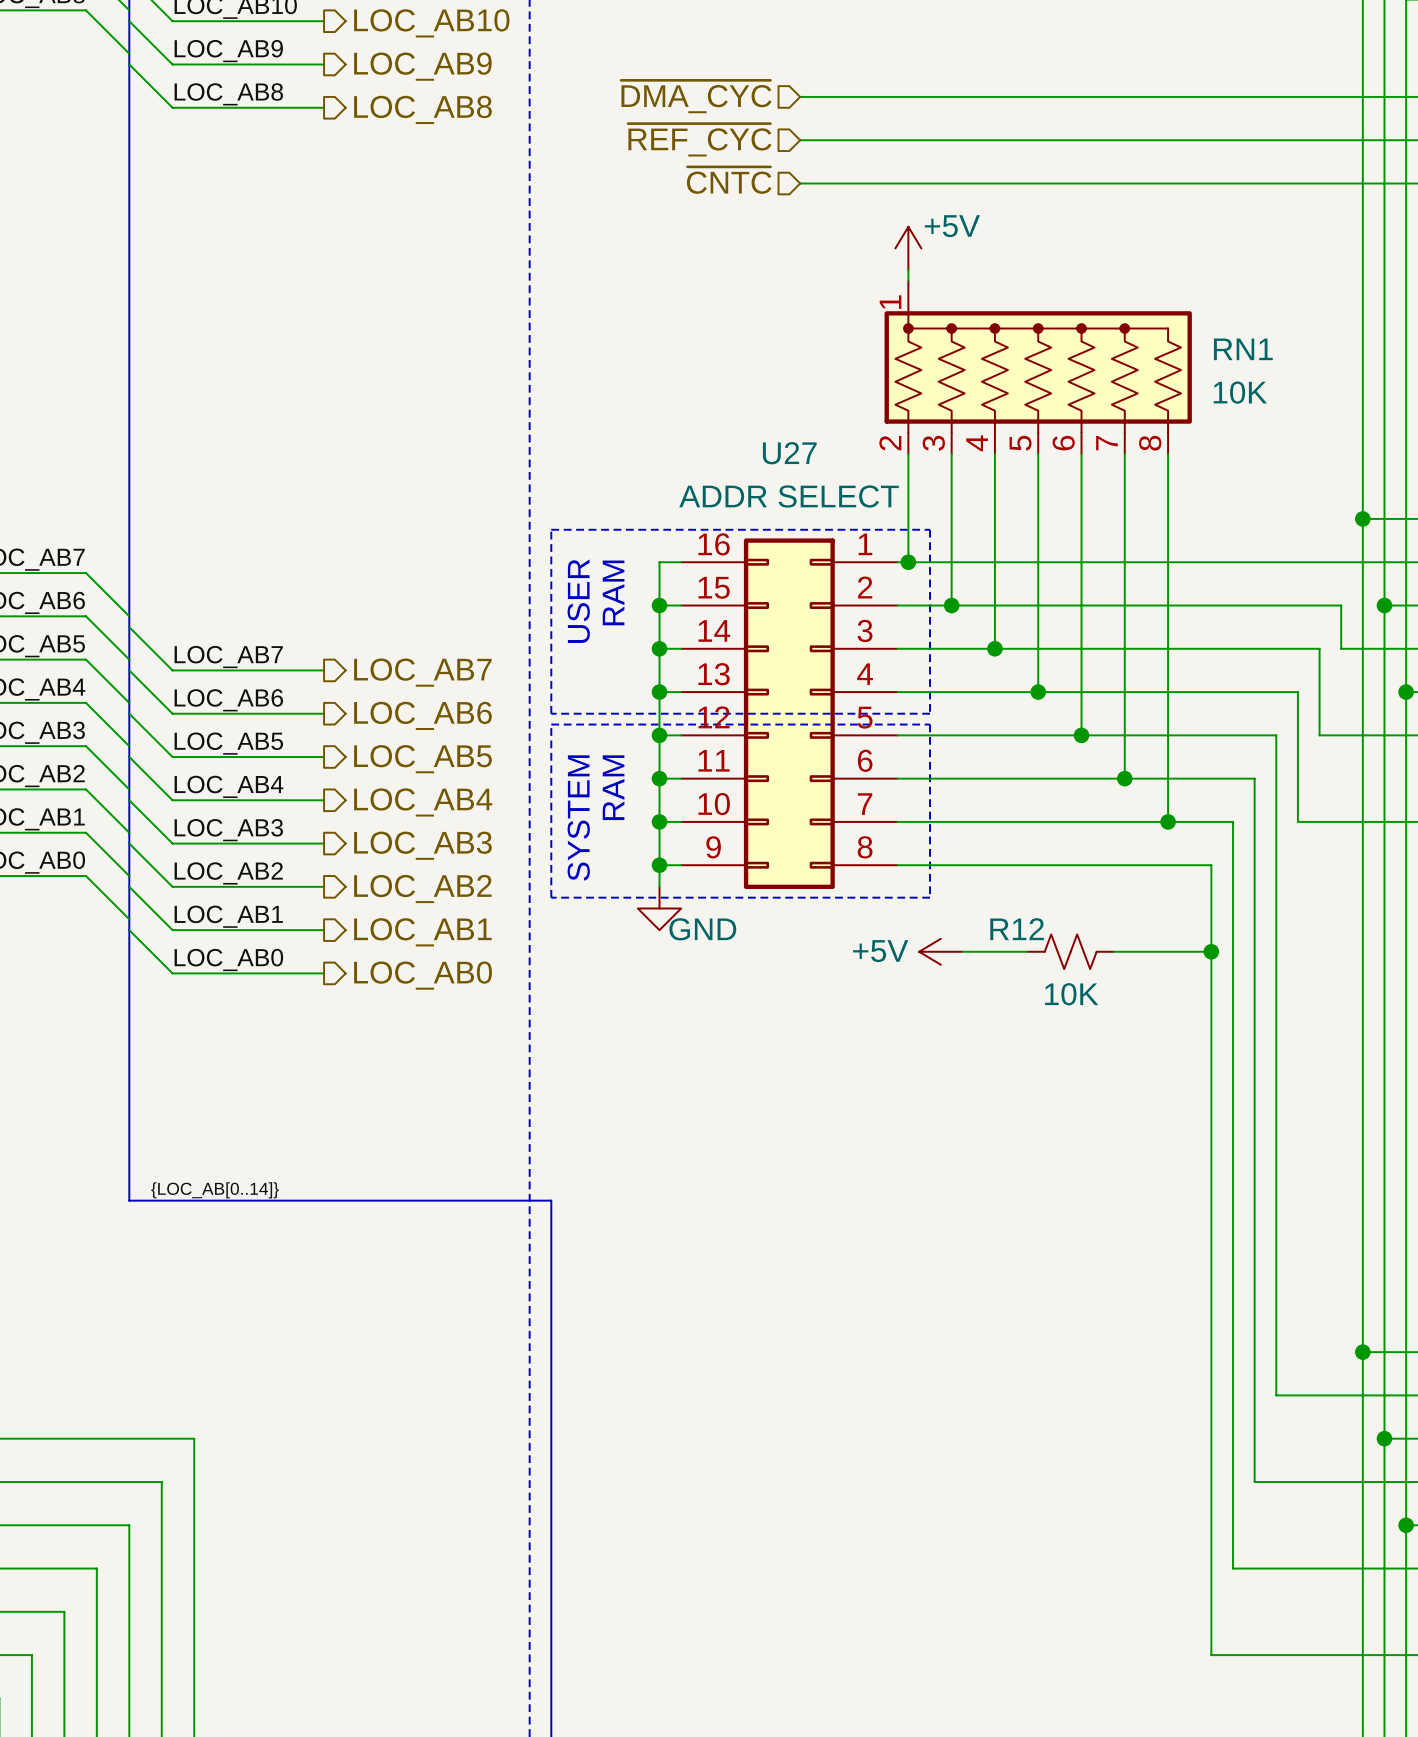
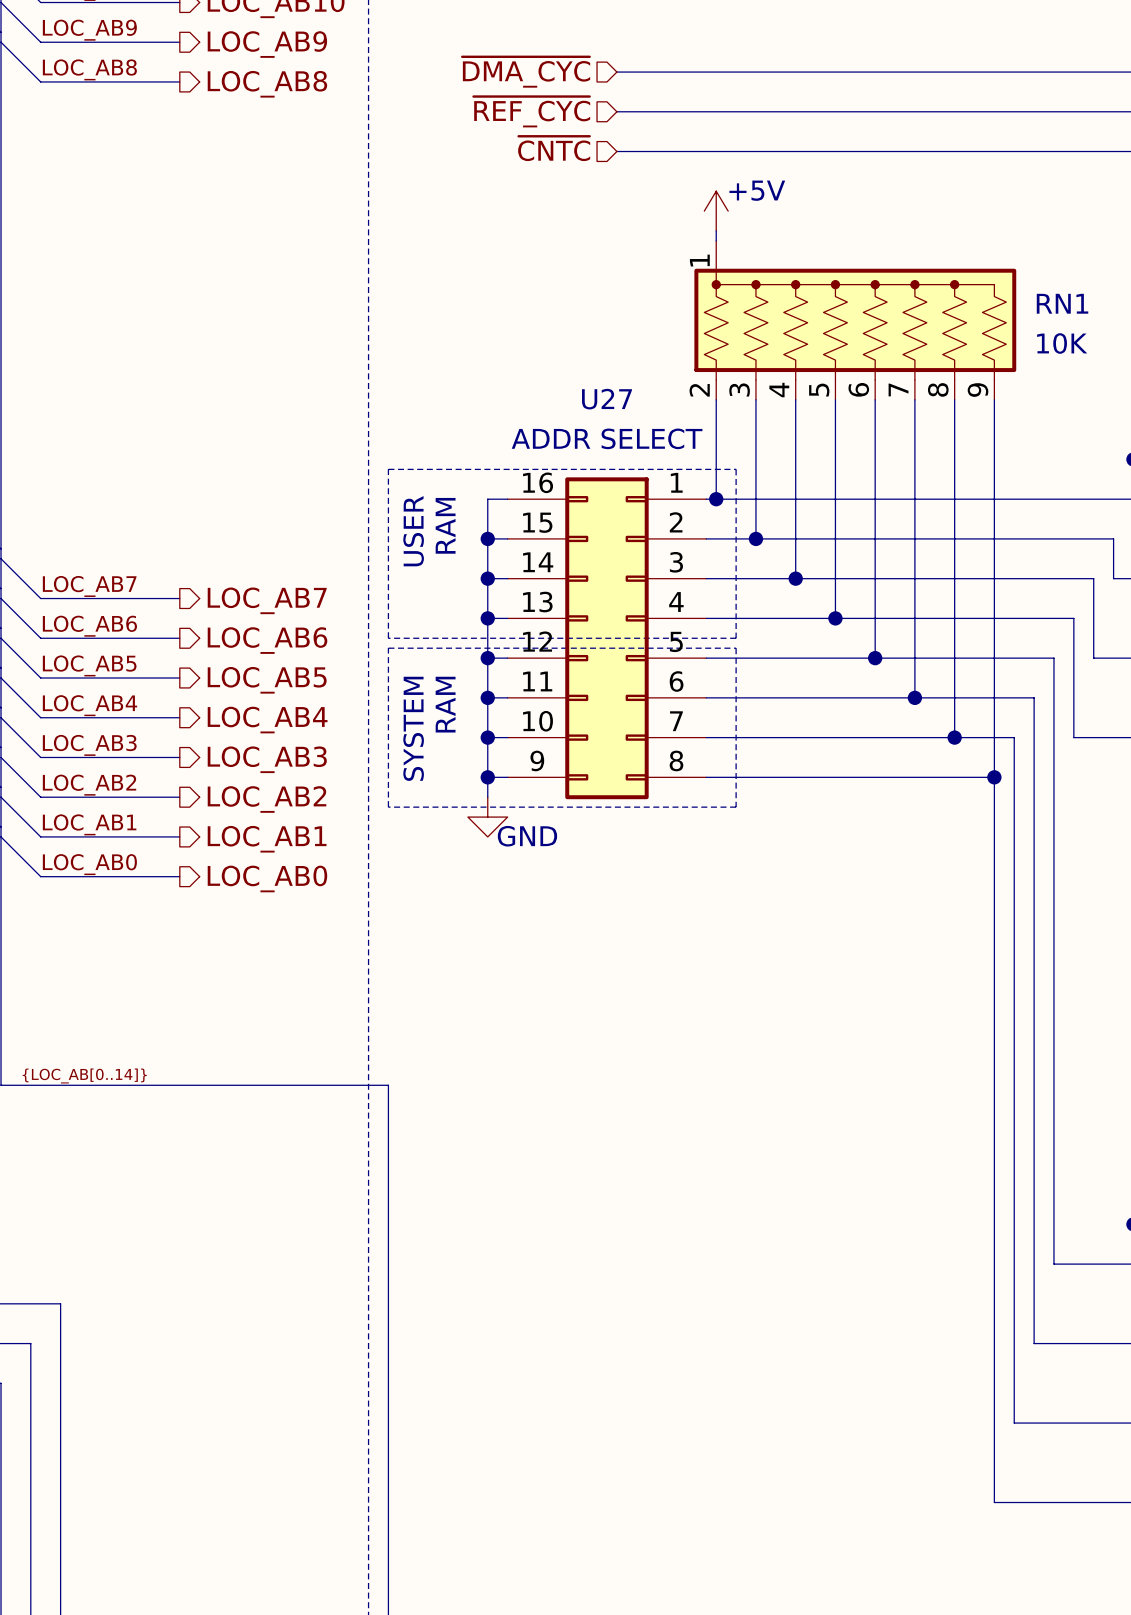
RN1 symbol: [884, 280, 1192, 455] -> [694, 240, 1017, 400]
wire: none -> (994, 399) (994, 777)
power symbol: +5V (940, 951) -> none
wire: (962, 951) (1027, 951) -> none
R12: 10K (1070, 951) -> none
wire: (1113, 951) (1211, 951) -> none
junction position: (1211, 951) -> (994, 777)

